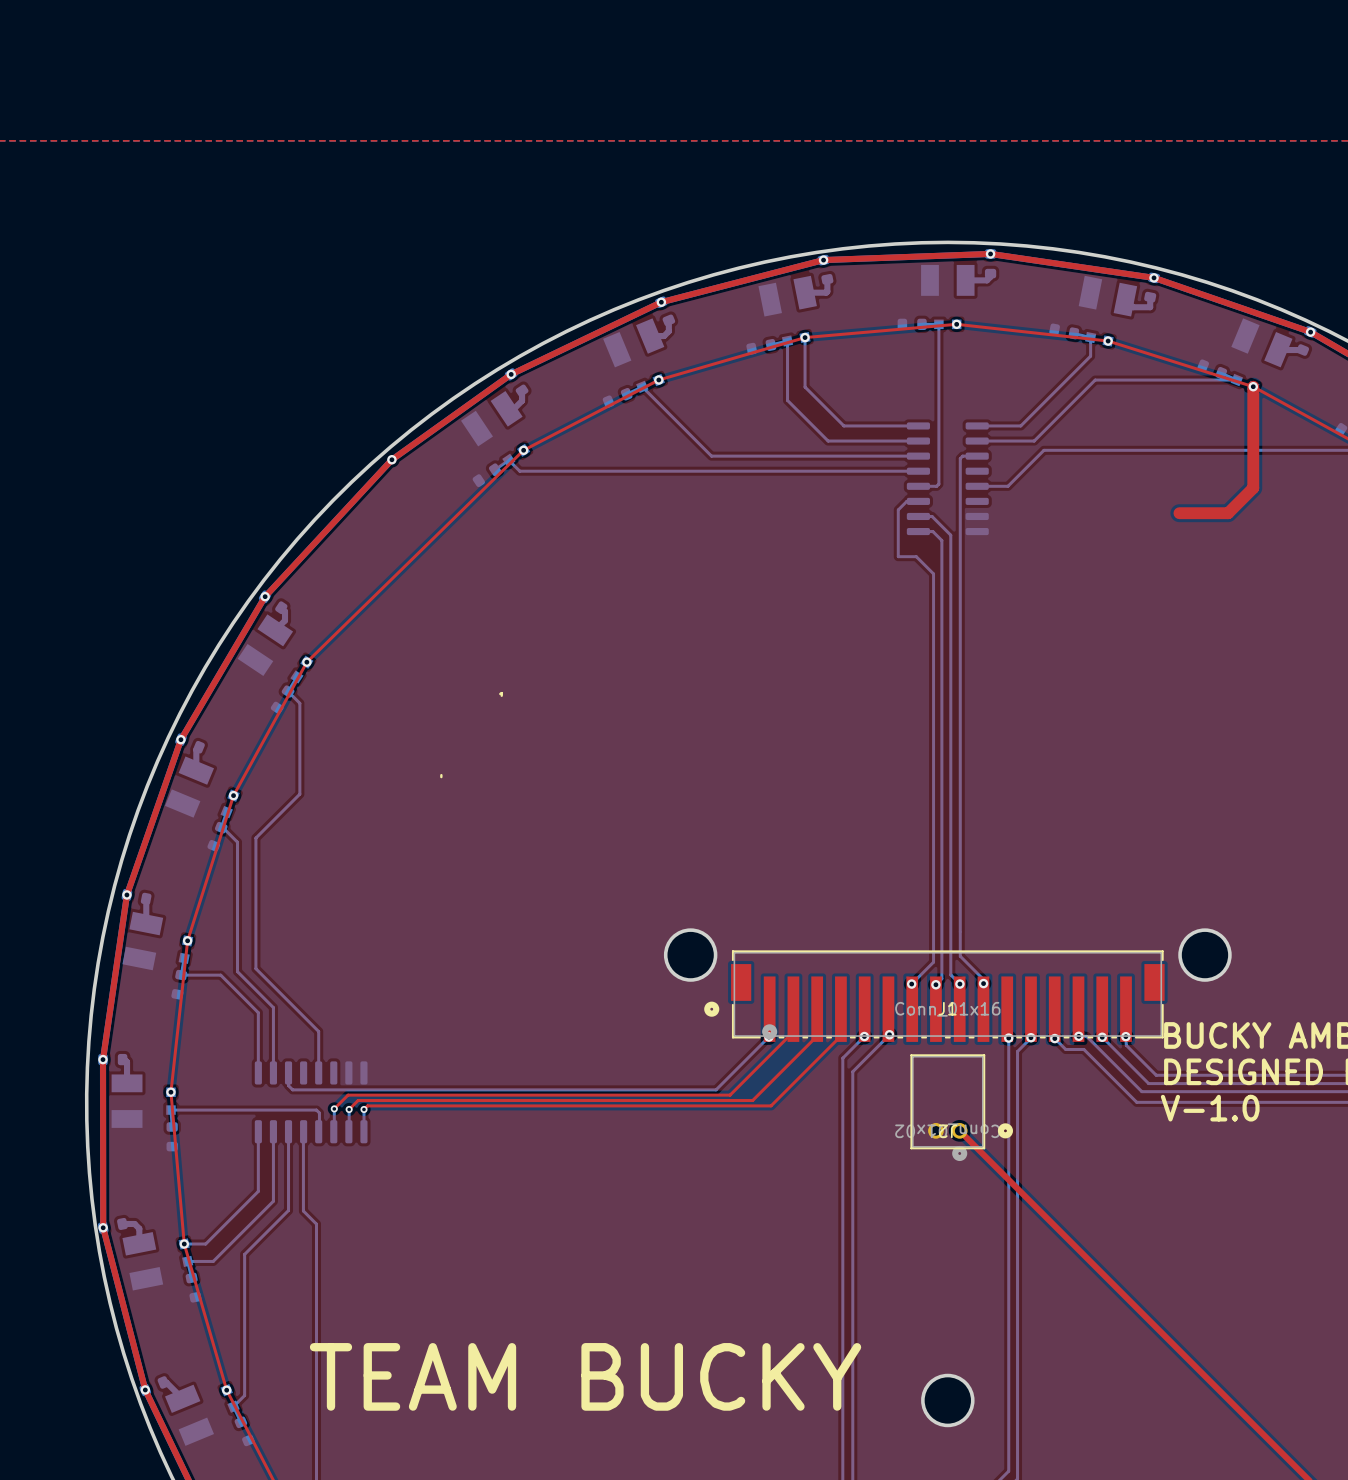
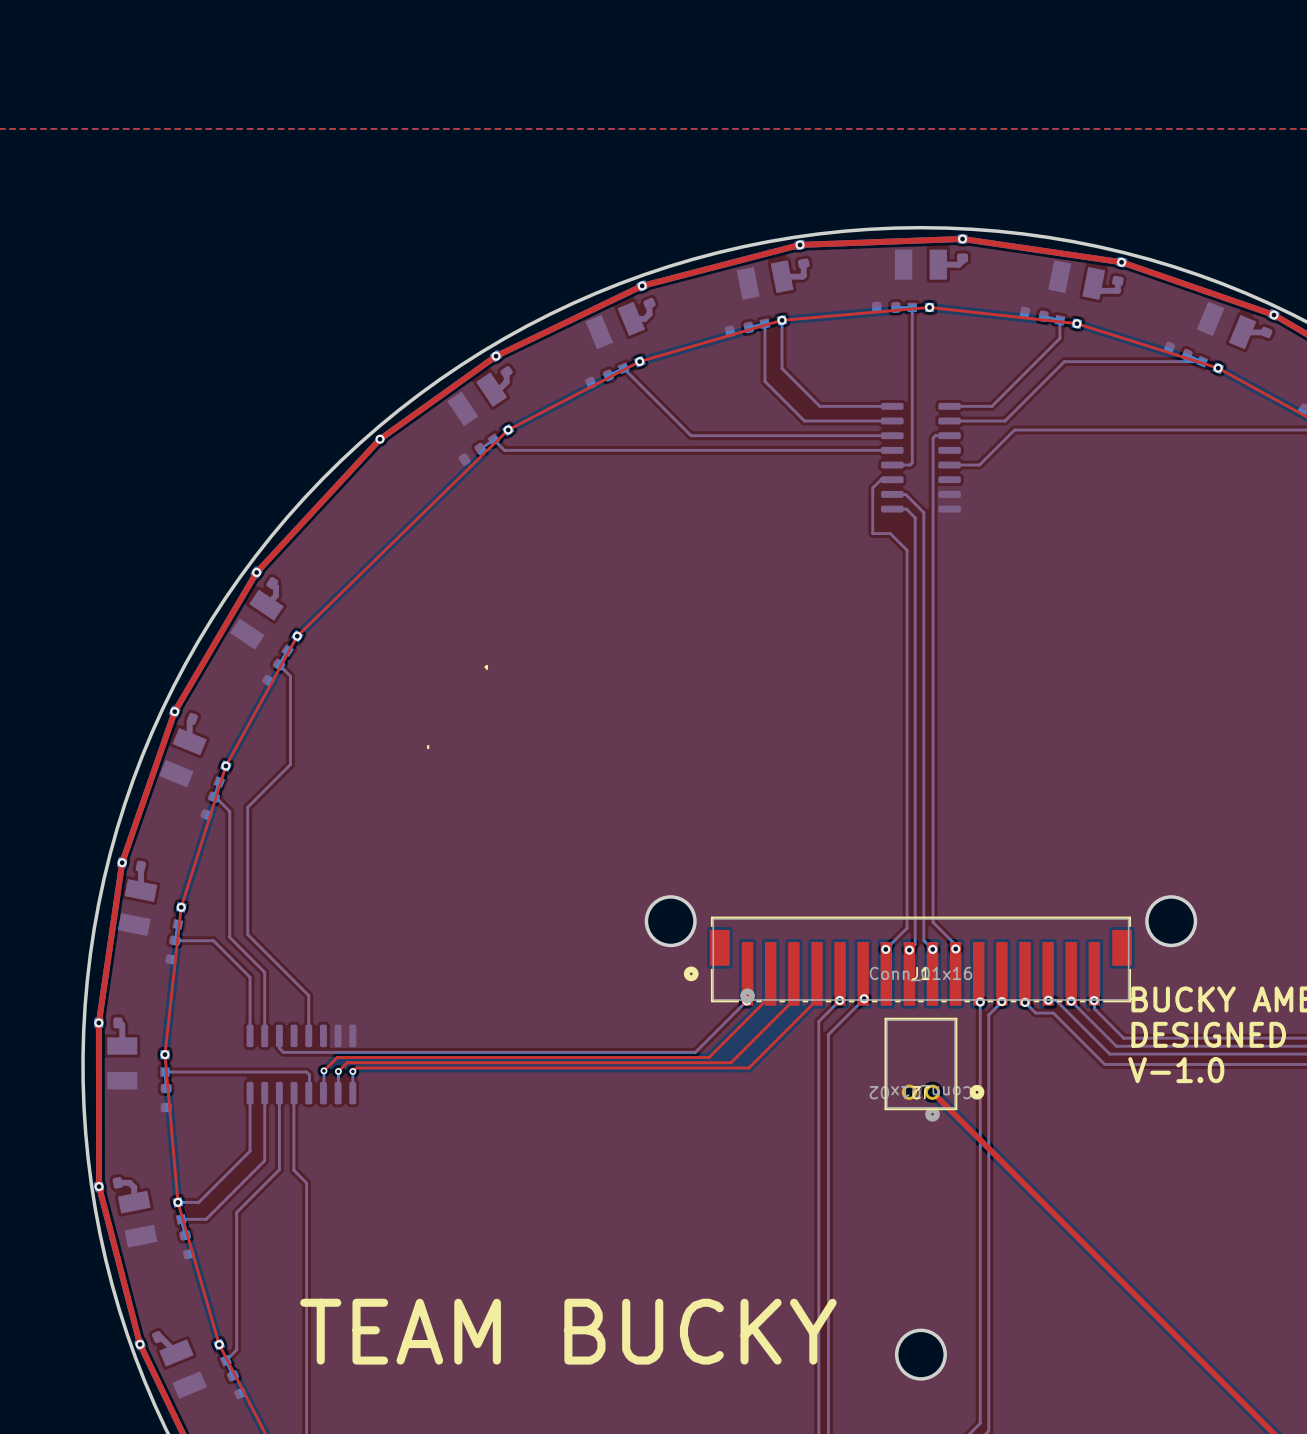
top track: (1253, 386) (1253, 488) (1228, 513) (1179, 513) -> none

